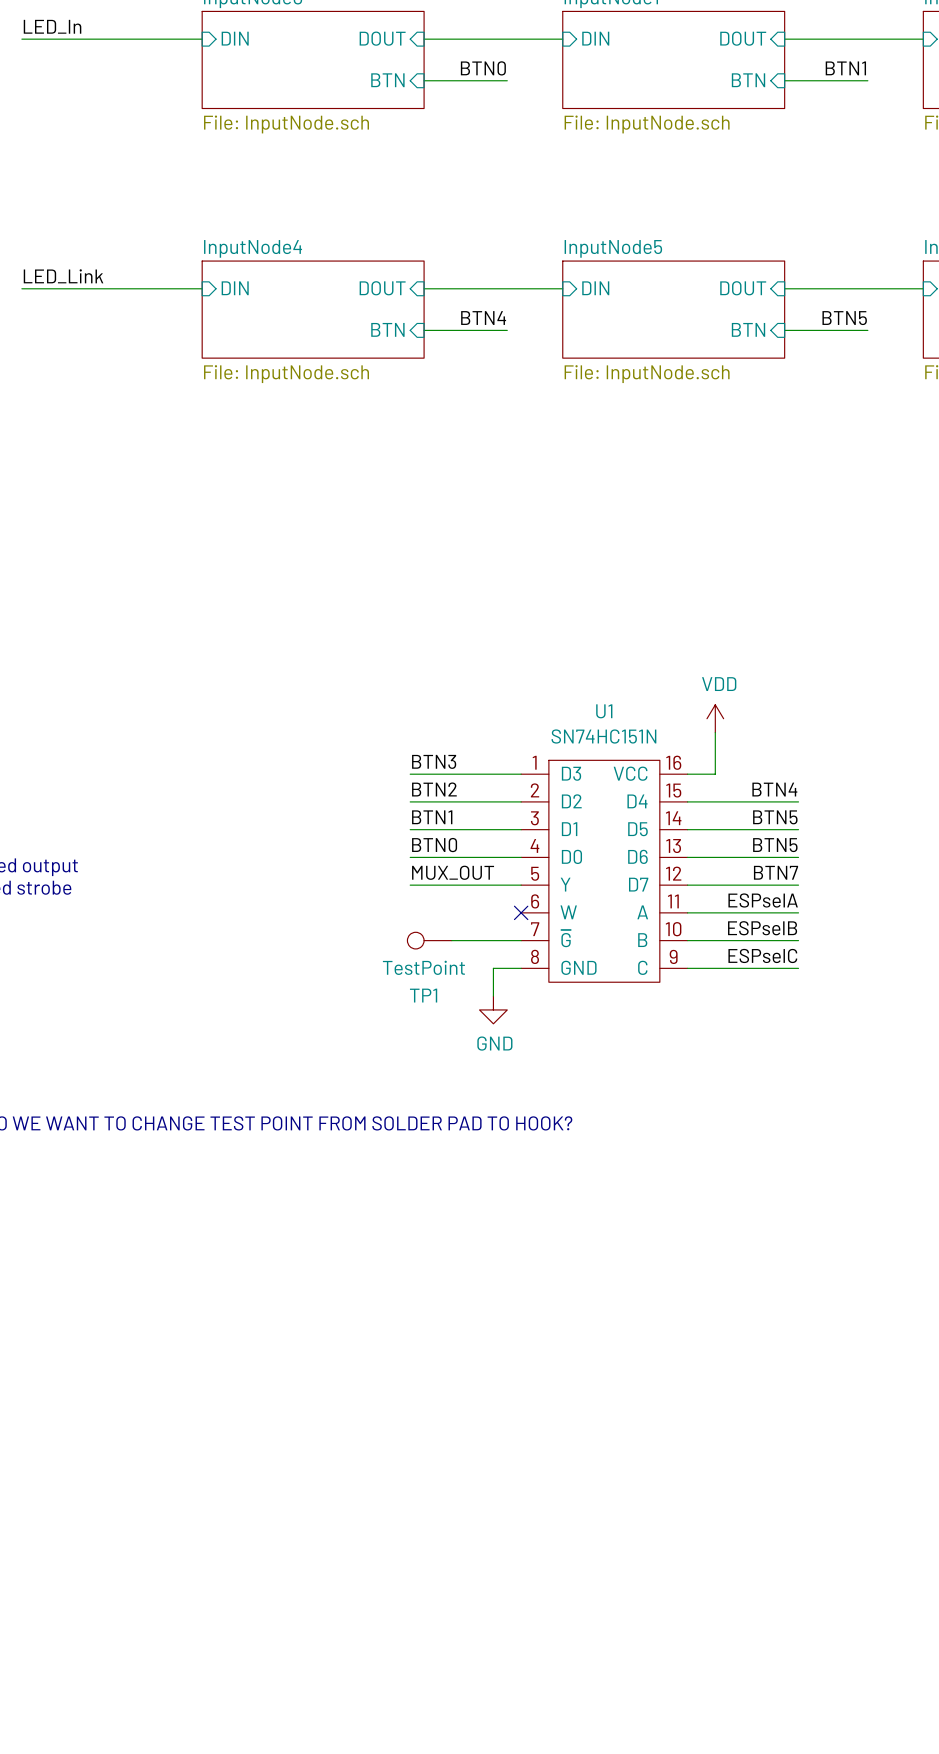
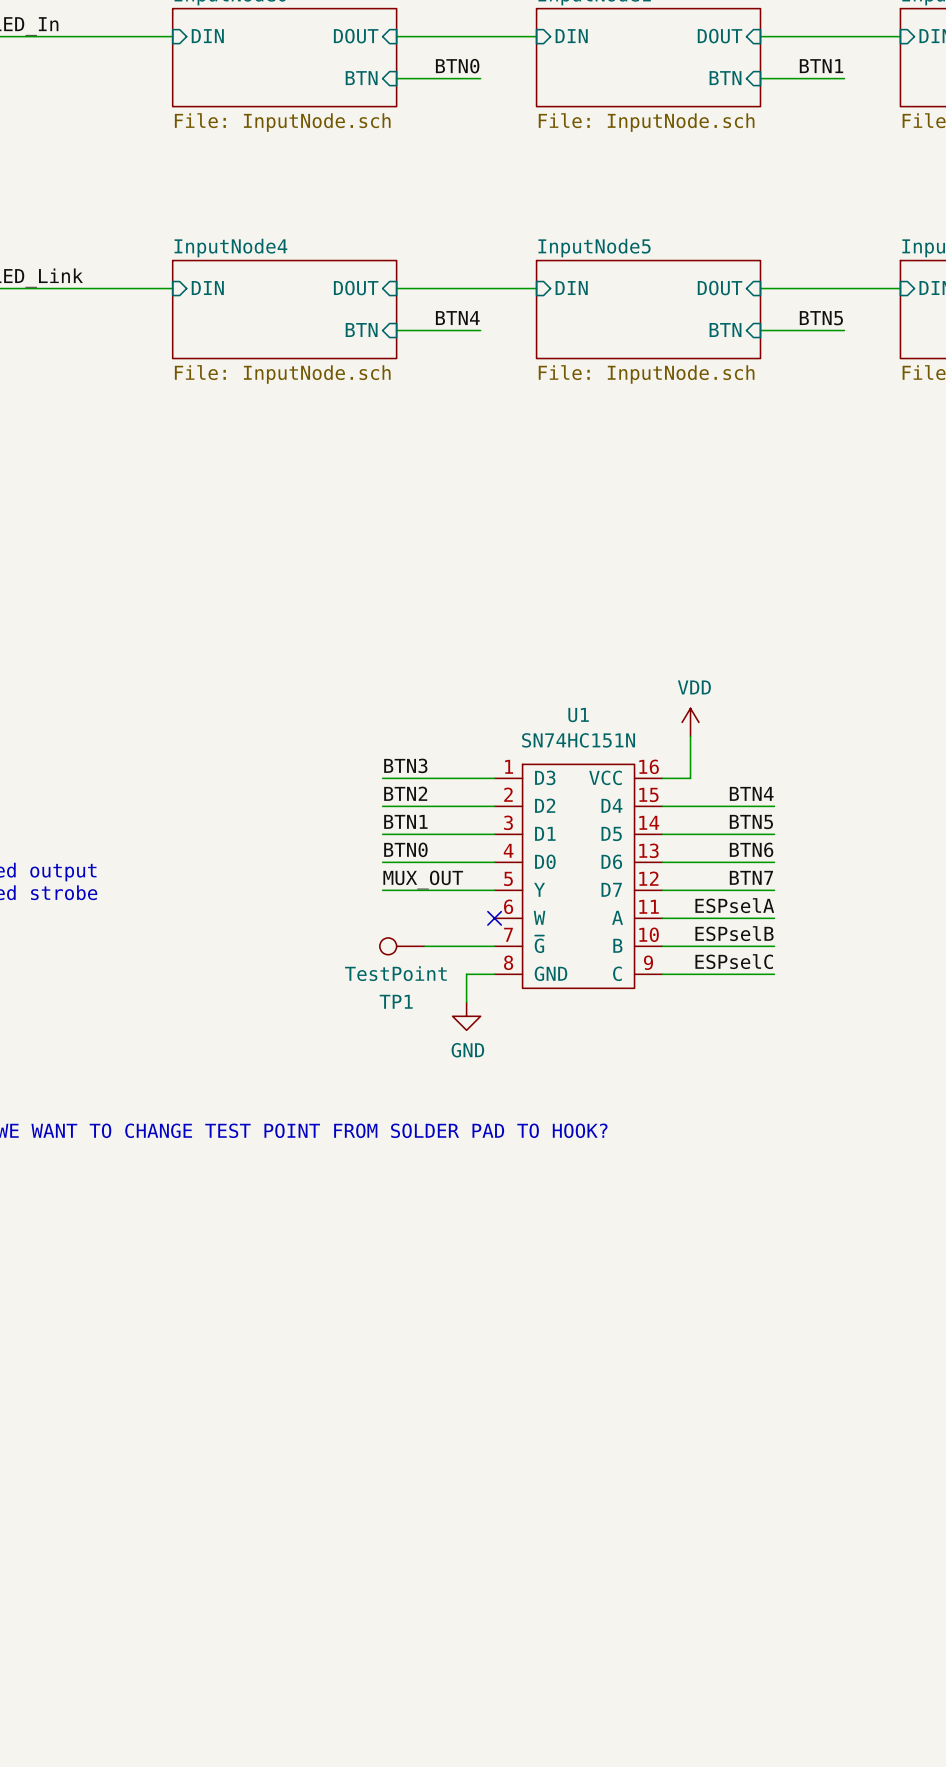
label: BTN5 (775, 845) -> BTN6 (751, 849)

